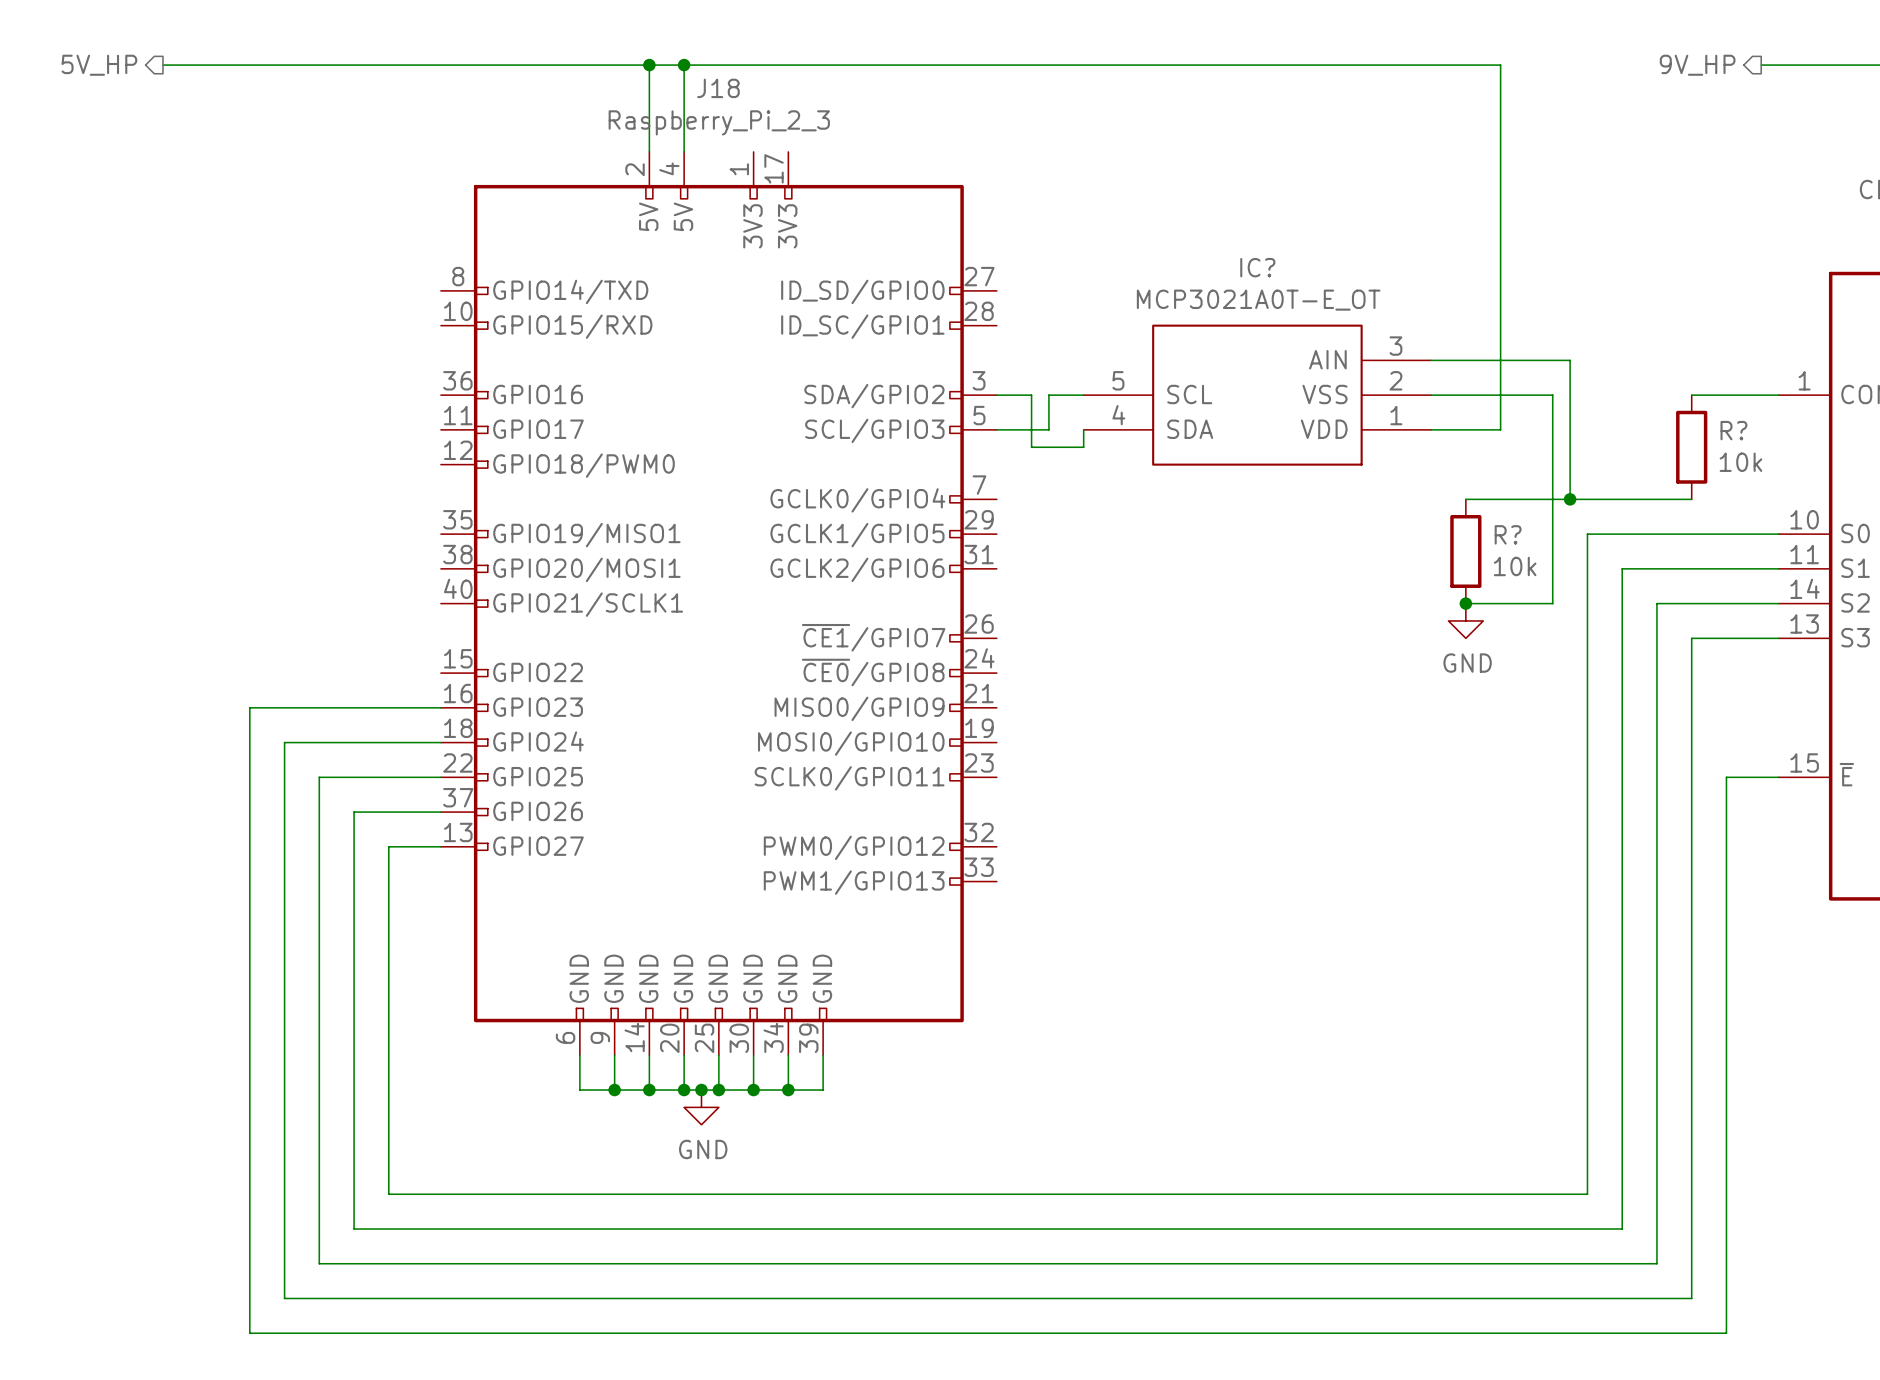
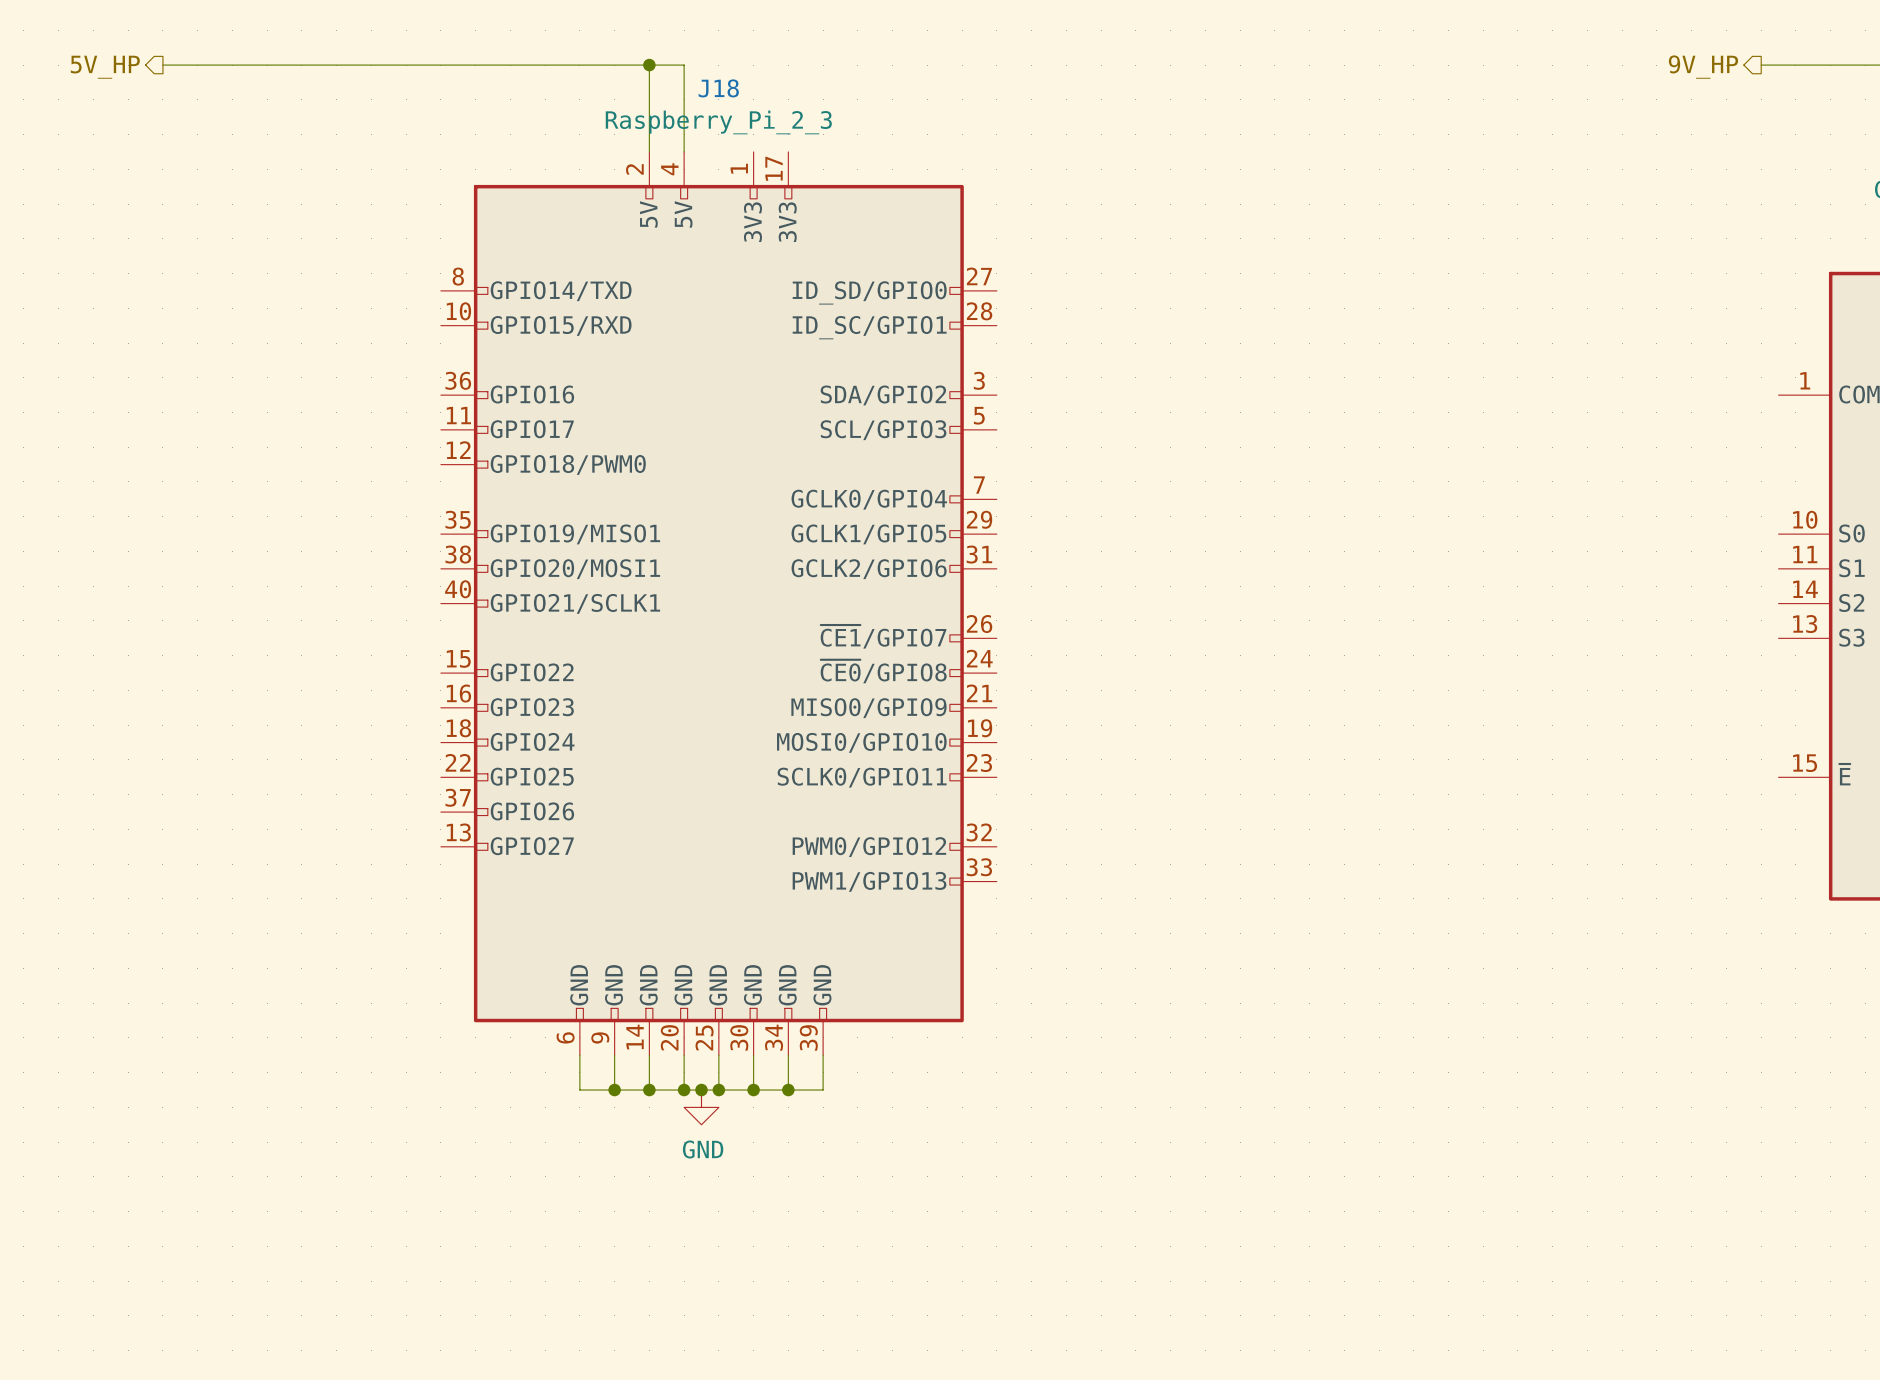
wire: (684, 65) (1500, 65) (1500, 429) (1431, 429) -> none
junction: (684, 65) -> none
wire: (1431, 360) (1570, 360) (1570, 499) -> none
wire: (996, 395) (1031, 395) (1031, 447) (1083, 447) (1083, 429) -> none
wire: (1083, 395) (1048, 395) (1048, 429) (996, 429) -> none
IC?: MCP3021A0T-E_OT (1257, 395) -> none
wire: (1431, 395) (1552, 395) (1552, 603) (1465, 603) -> none
wire: (1691, 395) (1778, 395) -> none
R?: 10k (1691, 447) -> none
wire: (1465, 499) (1691, 499) -> none
junction: (1570, 499) -> none
wire: (1778, 534) (1587, 534) (1587, 1194) (388, 1194) (388, 846) (440, 846) -> none
R?: 10k (1465, 551) -> none
wire: (1778, 568) (1622, 568) (1622, 1228) (354, 1228) (354, 812) (440, 812) -> none
junction: (1465, 603) -> none
wire: (1778, 603) (1656, 603) (1656, 1263) (319, 1263) (319, 777) (440, 777) -> none
power symbol: GND (1465, 620) -> none
wire: (1778, 638) (1691, 638) (1691, 1298) (284, 1298) (284, 742) (440, 742) -> none
wire: (440, 707) (249, 707) (249, 1333) (1726, 1333) (1726, 777) (1778, 777) -> none

